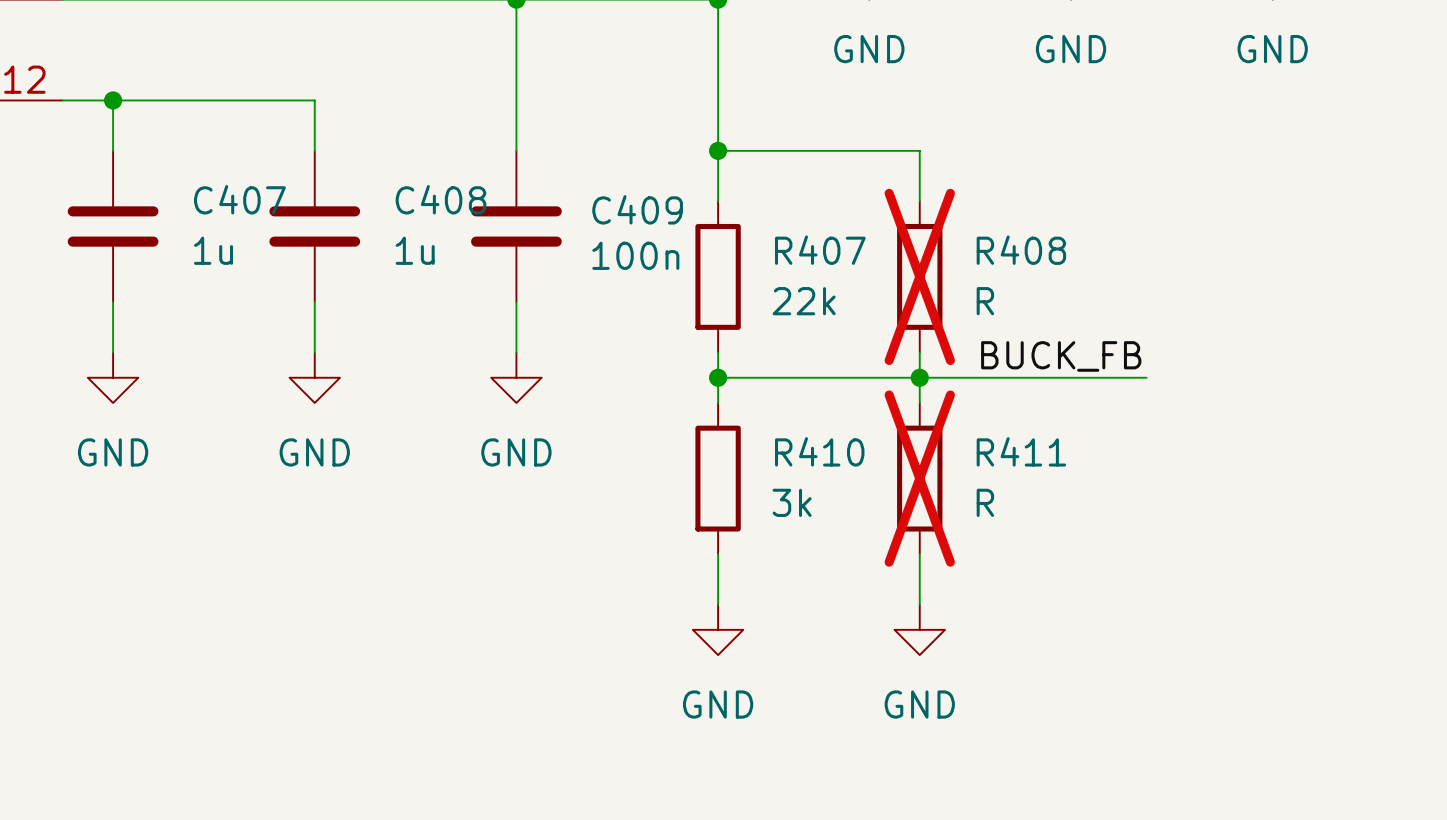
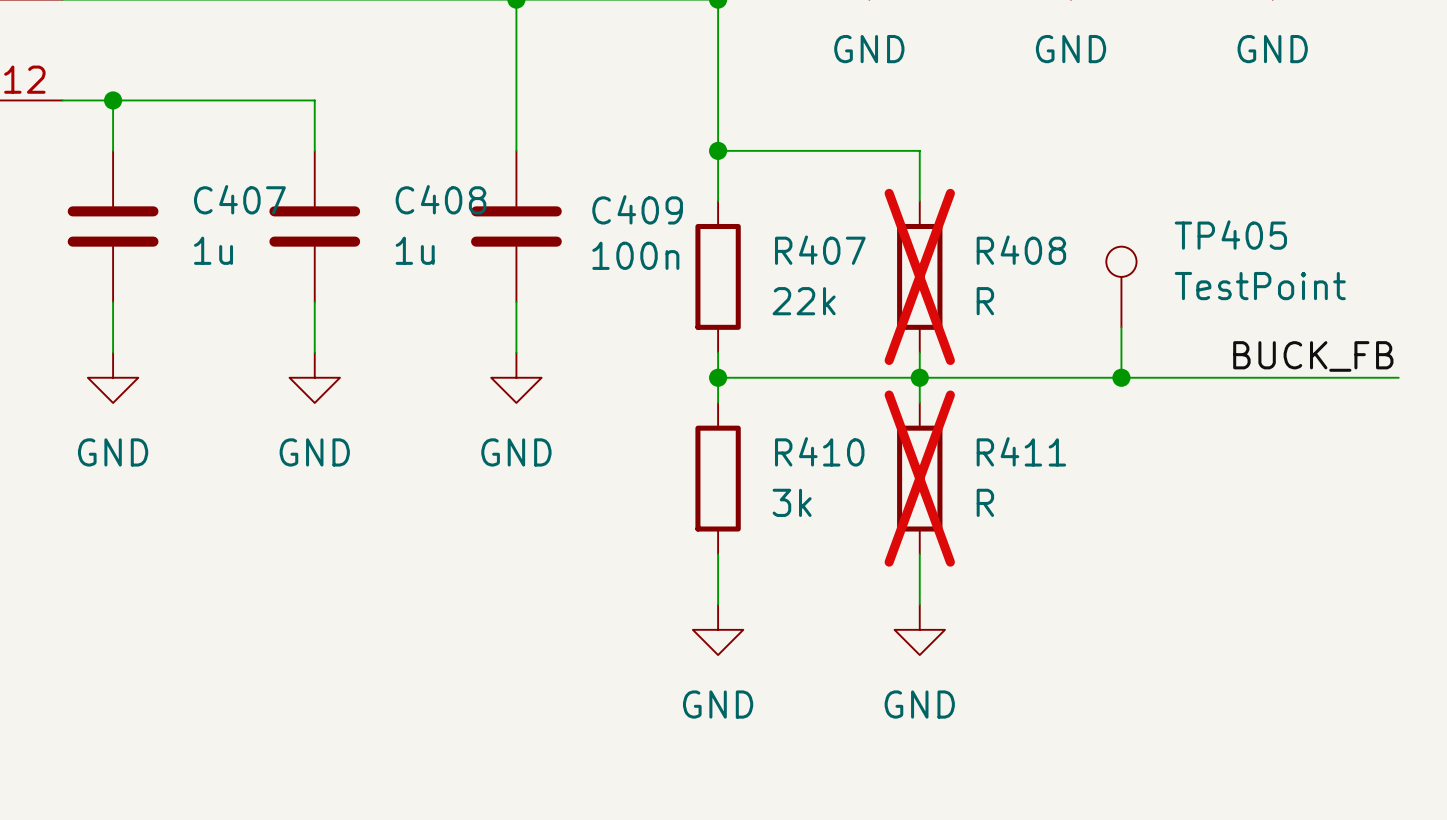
TP405: none -> TestPoint (1121, 287)
wire: none -> (1121, 327) (1121, 377)
label position: BUCK_FB (1061, 356) -> BUCK_FB (1313, 356)
junction: none -> (1121, 377)
wire: none -> (1146, 377) (1398, 377)

